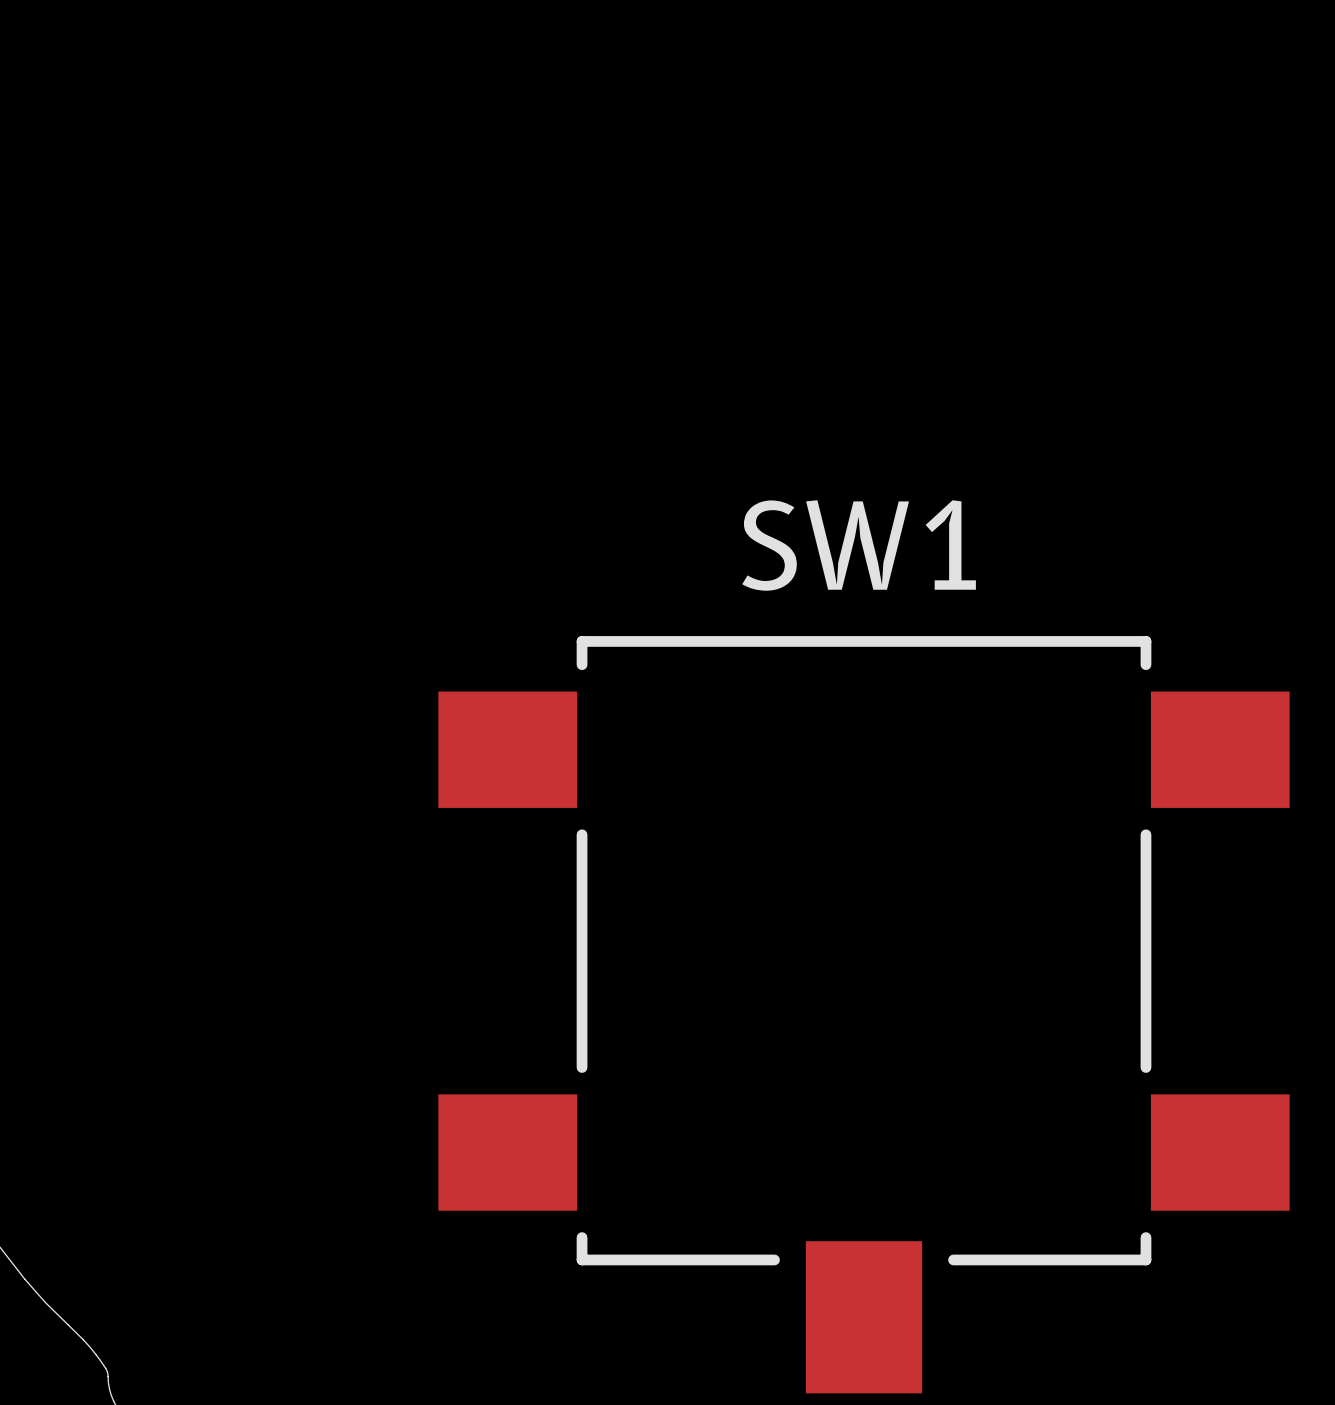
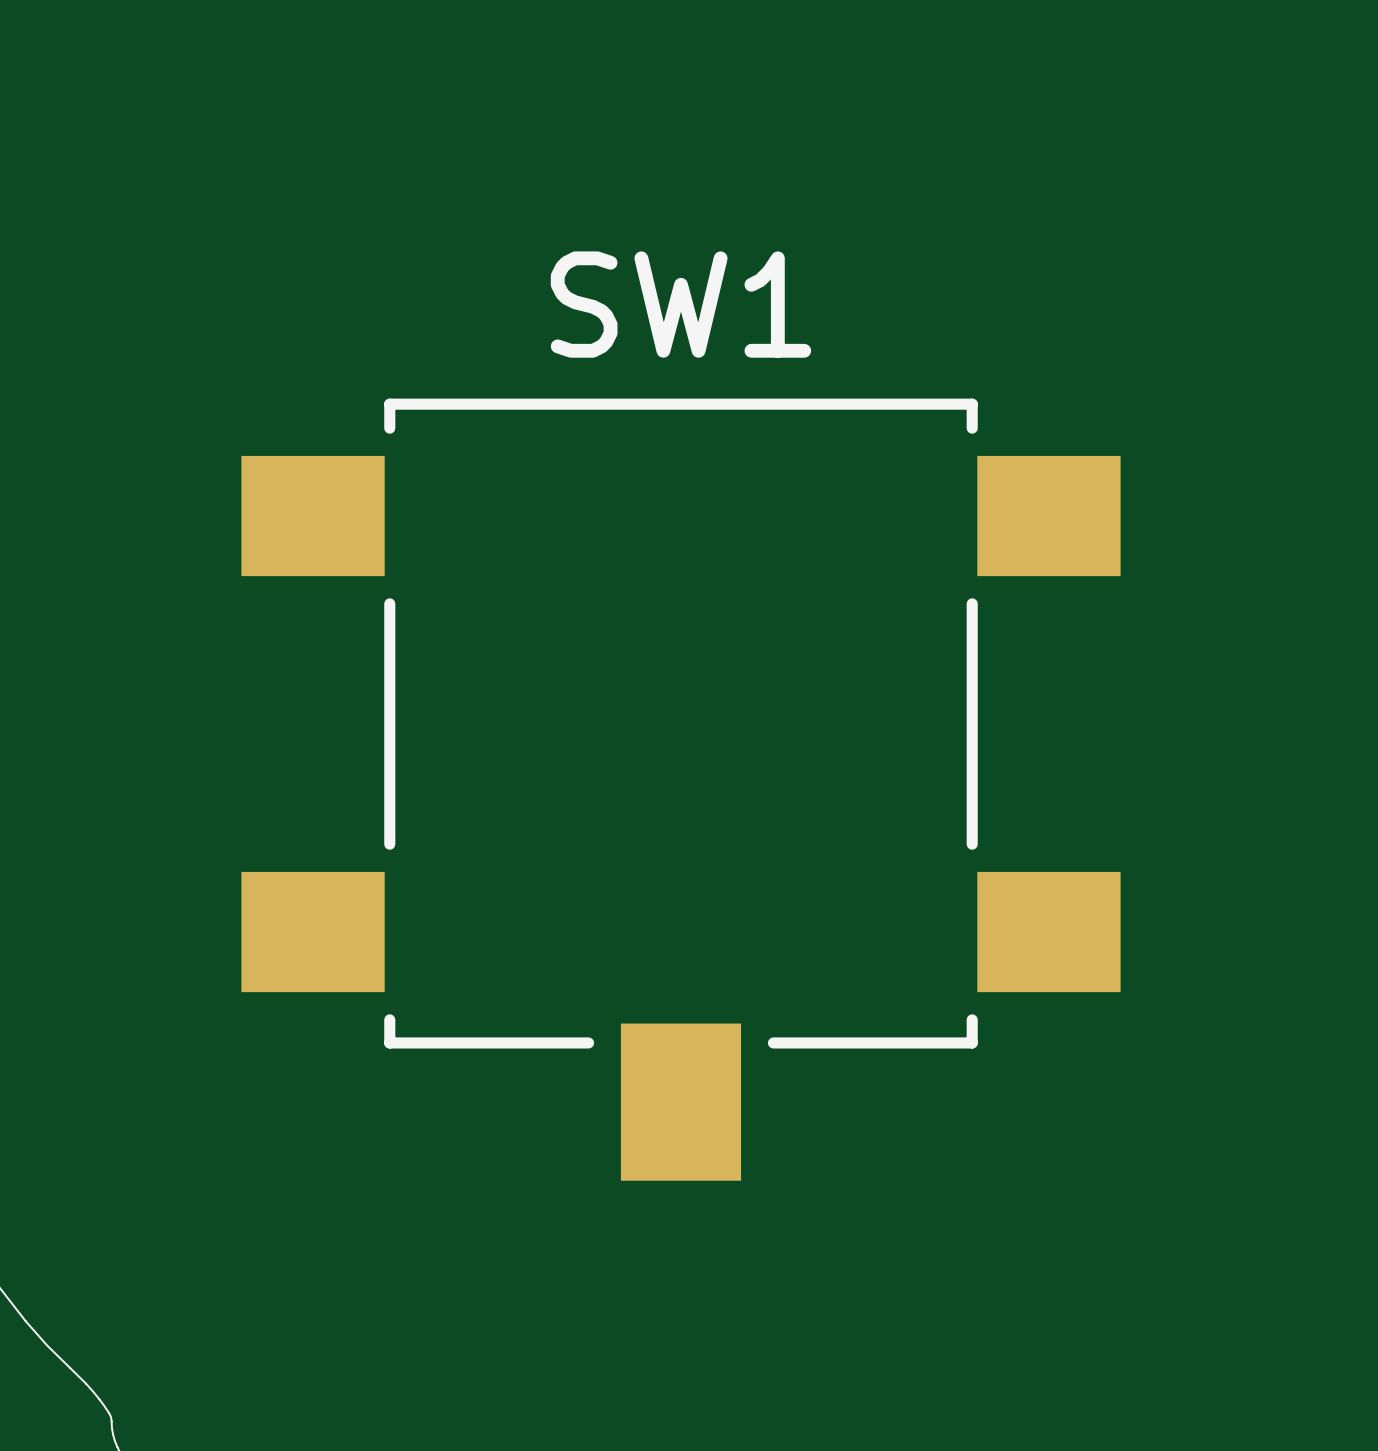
SW1 position: (864, 1014) -> (680, 789)

